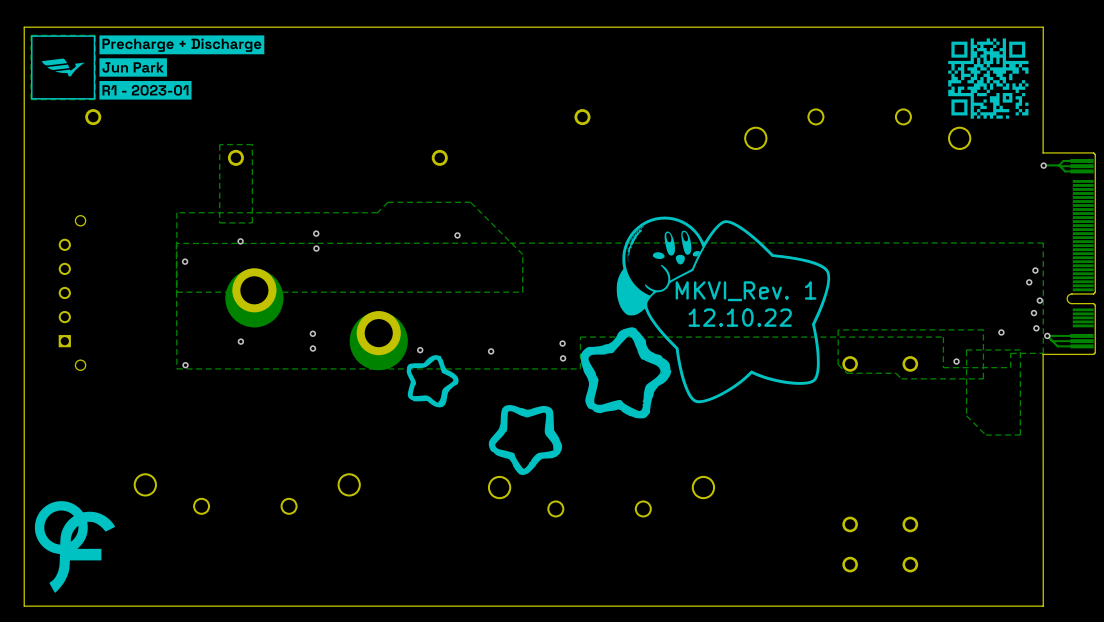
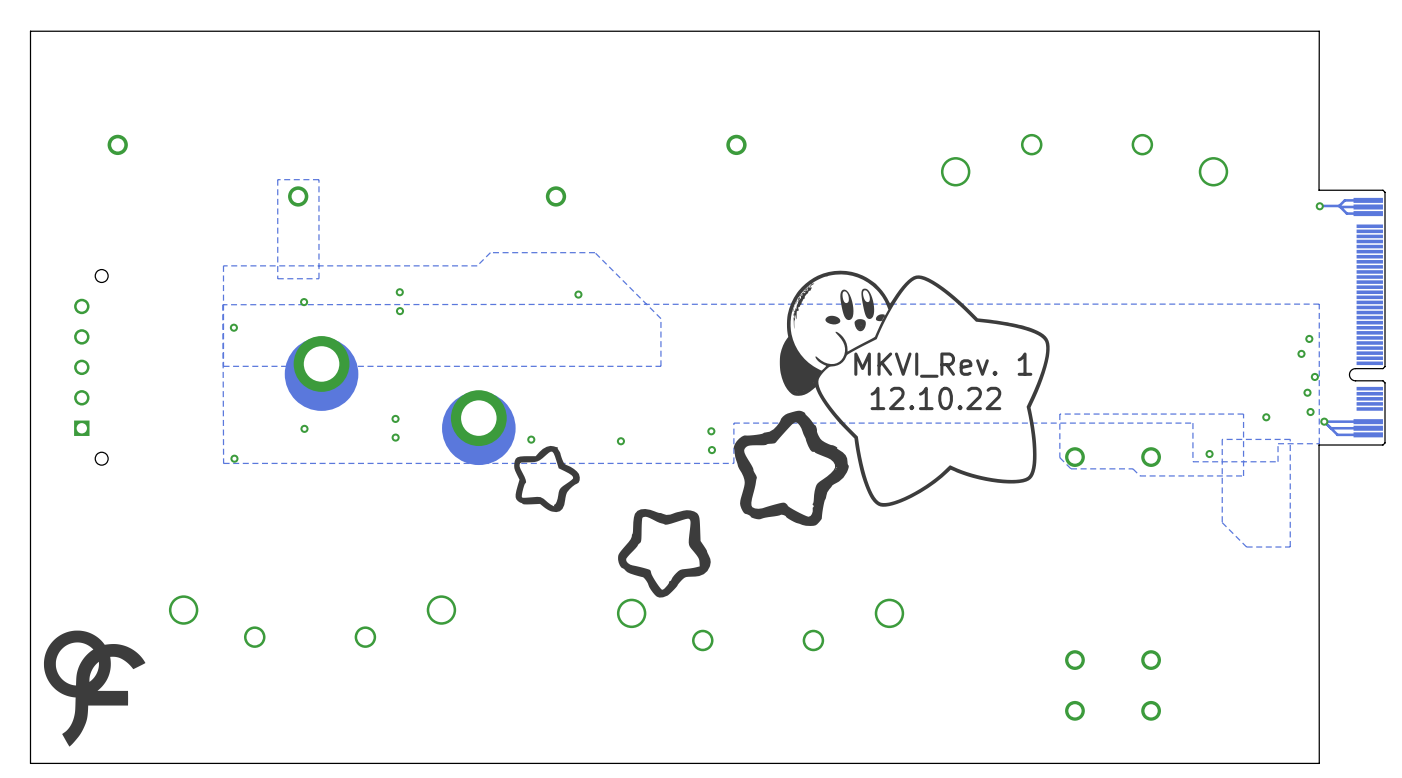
drawing: [31, 35, 265, 100] -> none
zone outline: (95, 35) (95, 99) (31, 99) (31, 35) (95, 35) -> none
drawing: [948, 38, 1029, 119] -> none

